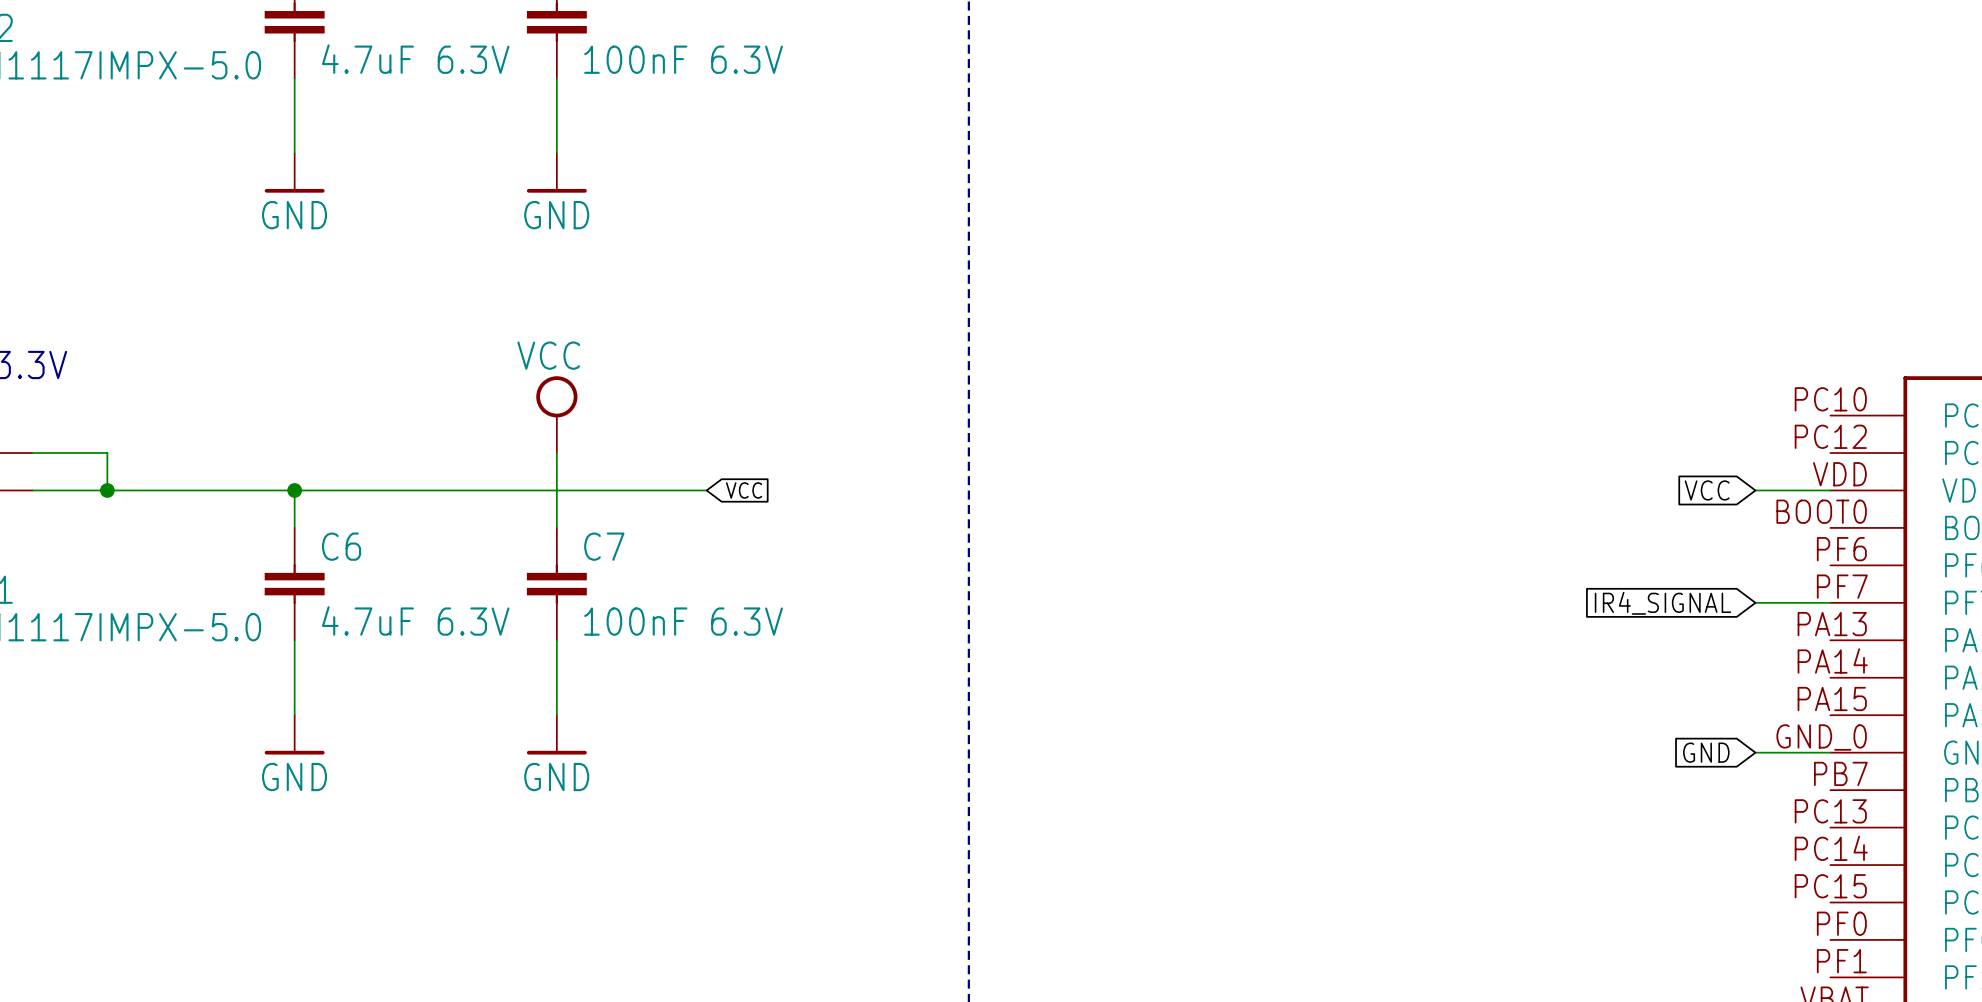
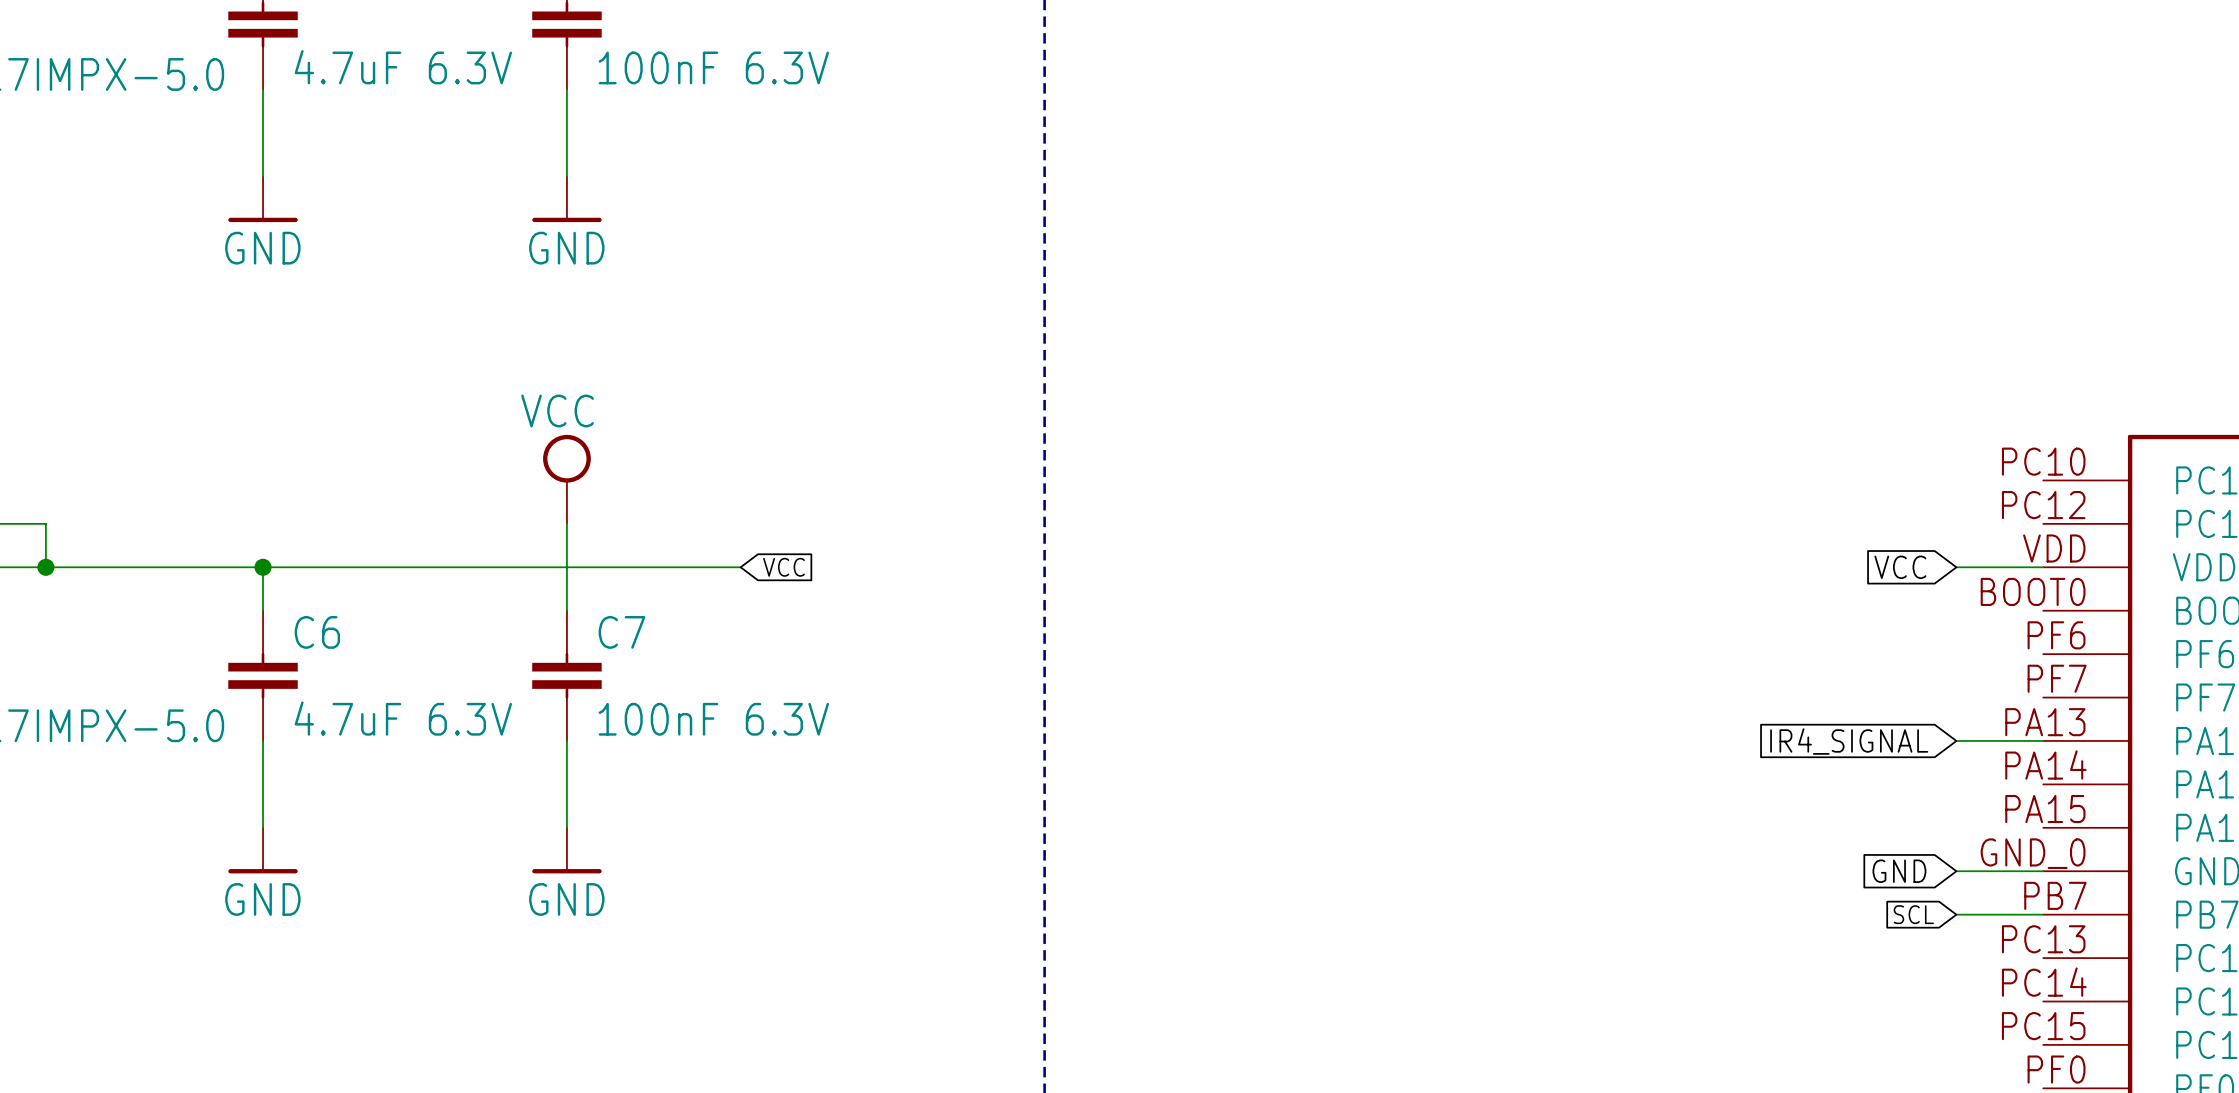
wire: (1755, 602) (1830, 602) -> (1956, 740) (2043, 740)
global label position: IR4_SIGNAL (1663, 603) -> IR4_SIGNAL (1849, 741)
global label: none -> SCL (1913, 914)
wire: none -> (1956, 914) (2043, 914)

